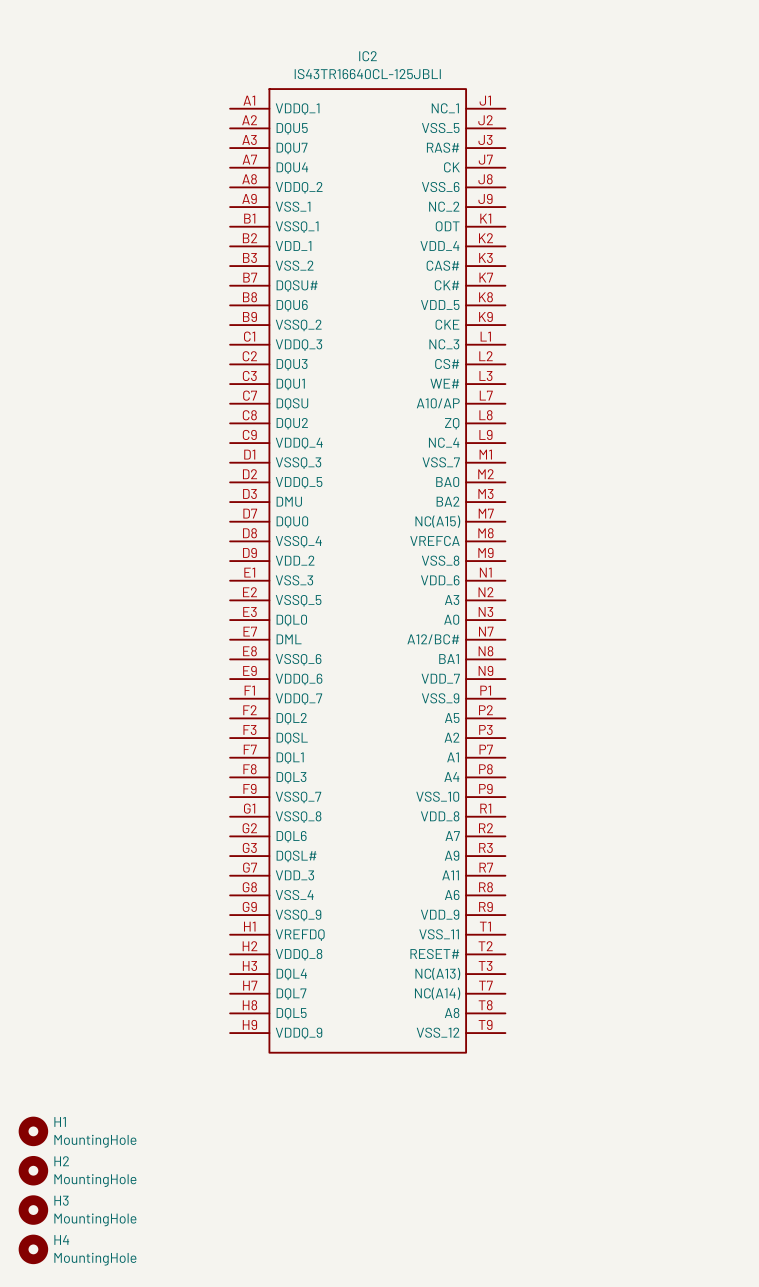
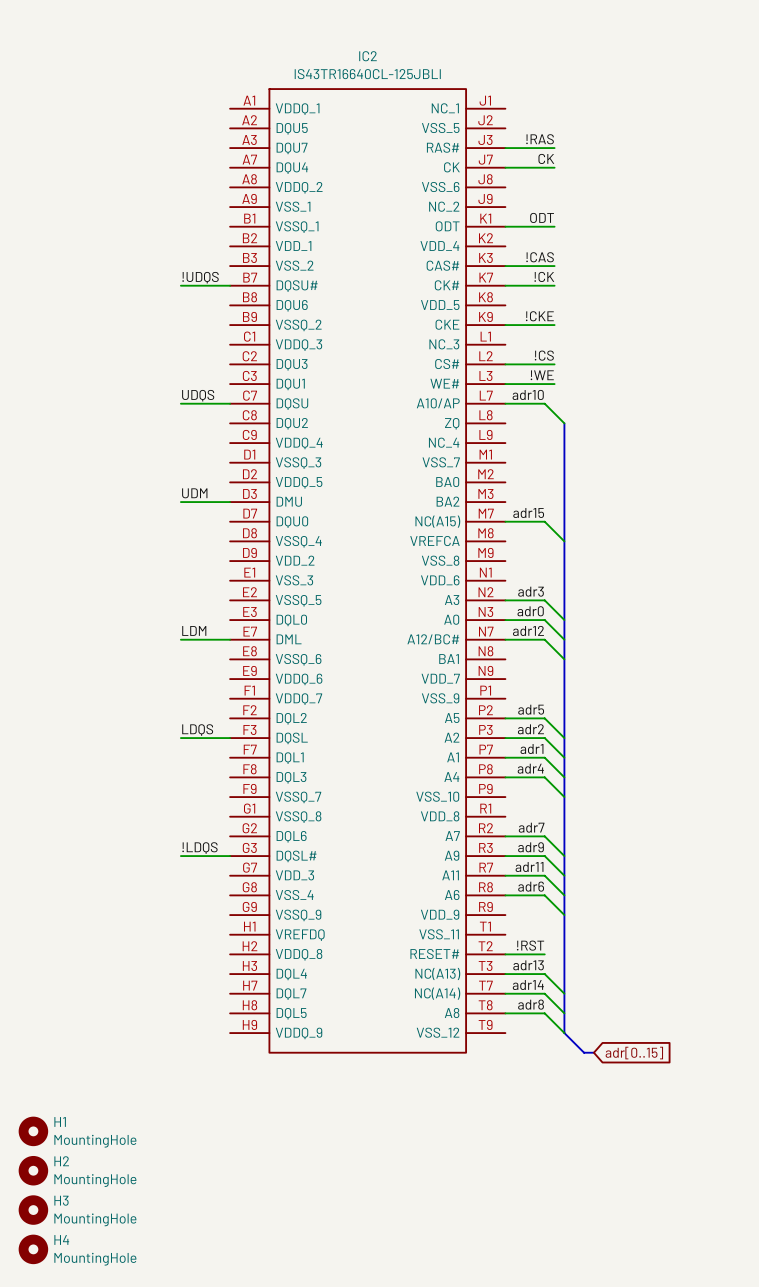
label: none -> !RAS (540, 139)
wire: none -> (505, 148) (554, 148)
label: none -> CK (546, 158)
wire: none -> (505, 167) (554, 167)
label: none -> ODT (542, 217)
wire: none -> (505, 226) (554, 226)
label: none -> !CAS (540, 257)
wire: none -> (505, 266) (554, 266)
label: none -> !CK (544, 276)
label: none -> !UDQS (200, 277)
wire: none -> (180, 285) (230, 285)
wire: none -> (505, 285) (554, 285)
label: none -> !CKE (539, 316)
wire: none -> (505, 325) (554, 325)
label: none -> !CS (544, 355)
wire: none -> (505, 364) (554, 364)
label: none -> !WE (542, 375)
wire: none -> (505, 384) (554, 384)
label: none -> adr10 (528, 394)
label: none -> UDQS (198, 395)
wire: none -> (180, 403) (230, 403)
wire: none -> (505, 403) (544, 403) (564, 423)
bus: none -> (564, 423) (564, 1033) (584, 1052) (593, 1052)
label: none -> UDM (194, 493)
wire: none -> (180, 502) (230, 502)
label: none -> adr15 (528, 513)
wire: none -> (505, 521) (544, 521) (564, 541)
label: none -> adr3 (531, 591)
wire: none -> (505, 600) (544, 600) (564, 620)
label: none -> adr0 (530, 611)
wire: none -> (505, 620) (544, 620) (564, 639)
label: none -> LDM (194, 630)
label: none -> adr12 (528, 630)
wire: none -> (180, 639) (230, 639)
wire: none -> (505, 639) (544, 639) (564, 659)
label: none -> adr5 (531, 709)
wire: none -> (505, 718) (544, 718) (564, 738)
label: none -> adr2 (530, 729)
label: none -> LDQS (197, 730)
wire: none -> (180, 738) (230, 738)
wire: none -> (505, 738) (544, 738) (564, 757)
label: none -> adr1 (531, 749)
wire: none -> (505, 757) (544, 757) (564, 777)
label: none -> adr4 (530, 768)
wire: none -> (505, 777) (544, 777) (564, 797)
label: none -> adr7 (531, 827)
wire: none -> (505, 836) (544, 836) (564, 856)
label: none -> adr9 (530, 847)
label: none -> !LDQS (199, 848)
wire: none -> (180, 856) (230, 856)
wire: none -> (505, 856) (544, 856) (564, 875)
label: none -> adr11 (529, 867)
wire: none -> (505, 875) (544, 875) (564, 895)
label: none -> adr6 (531, 886)
wire: none -> (505, 895) (544, 895) (564, 915)
label: none -> !RST (530, 945)
wire: none -> (505, 954) (544, 954)
label: none -> adr13 (528, 965)
wire: none -> (505, 974) (544, 974) (564, 993)
label: none -> adr14 (528, 985)
wire: none -> (505, 993) (544, 993) (564, 1013)
label: none -> adr8 (531, 1004)
wire: none -> (505, 1013) (544, 1013) (564, 1033)
global label: none -> adr[0..15] (634, 1053)

